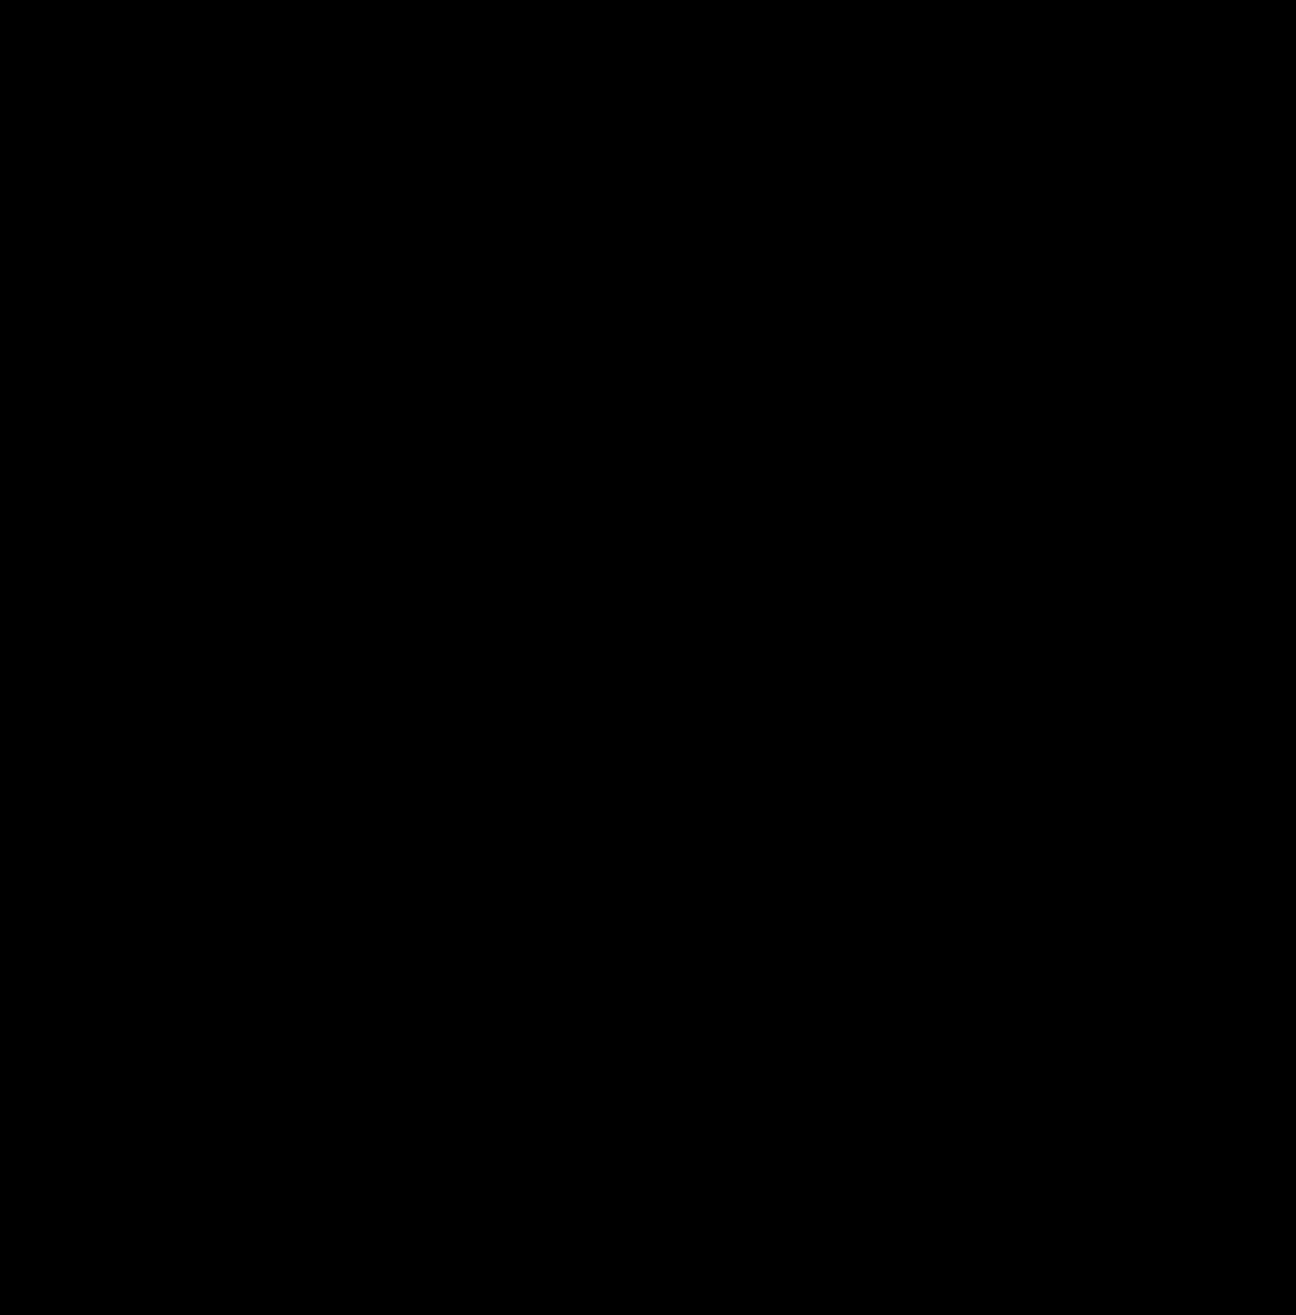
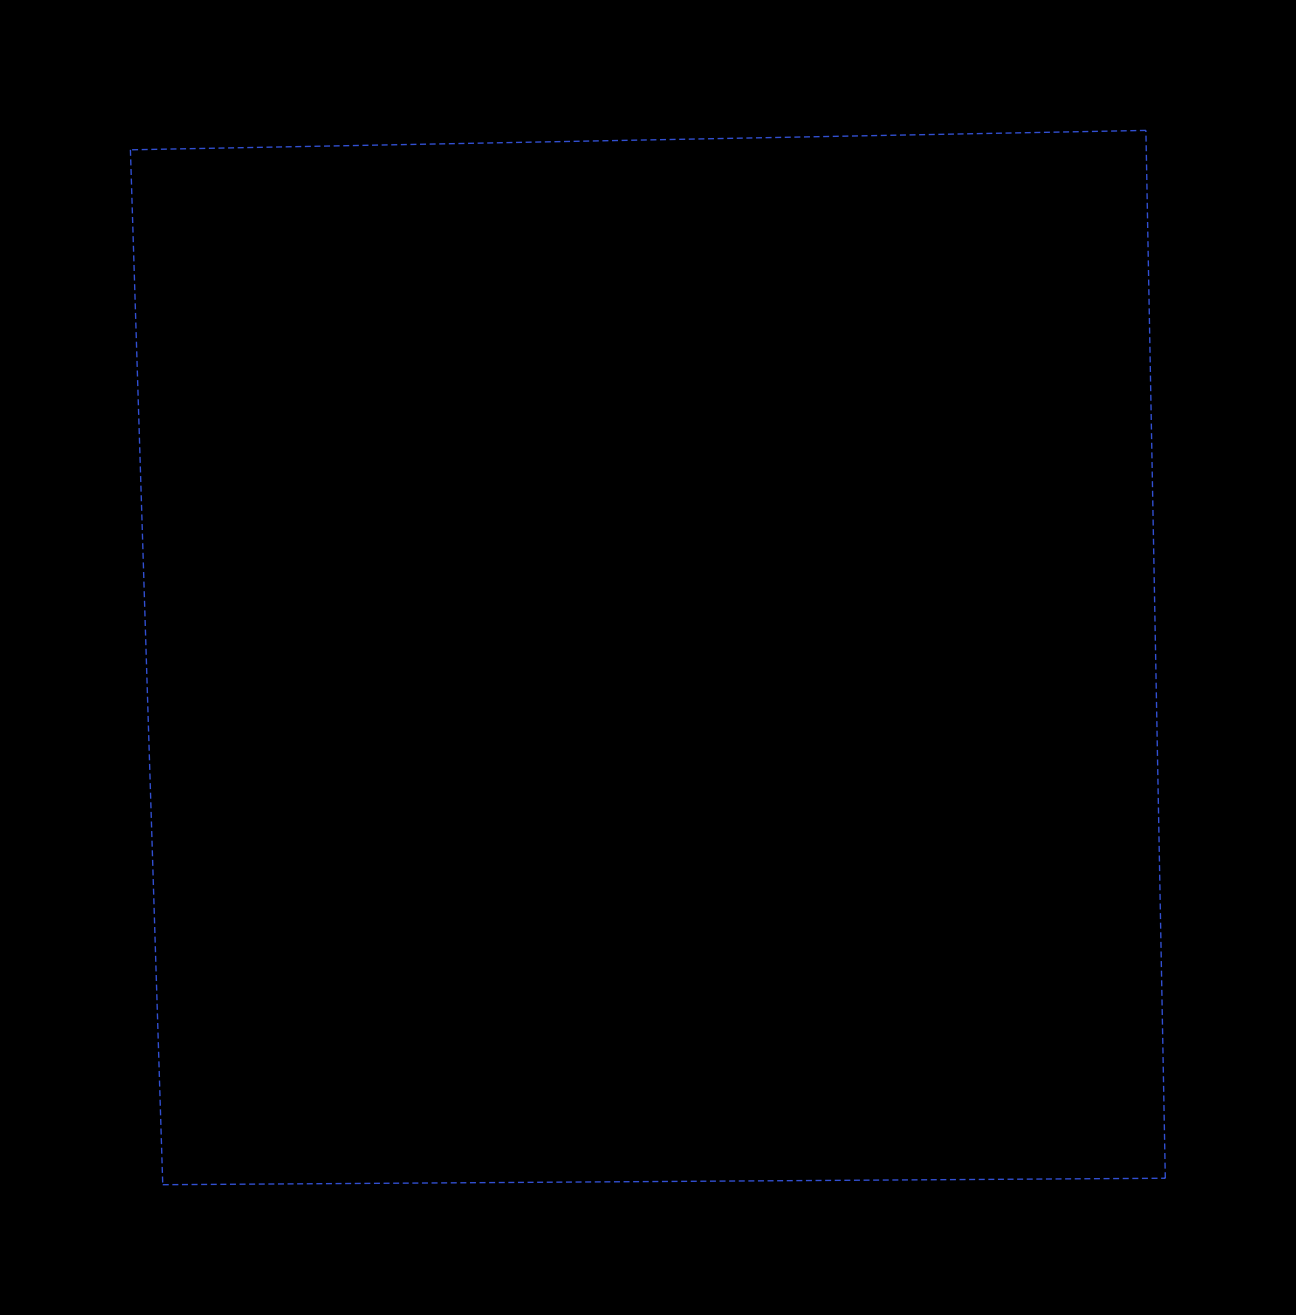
bottom zone outline: none -> (1145, 130) (1165, 1178) (162, 1184) (130, 149) (1145, 130)

